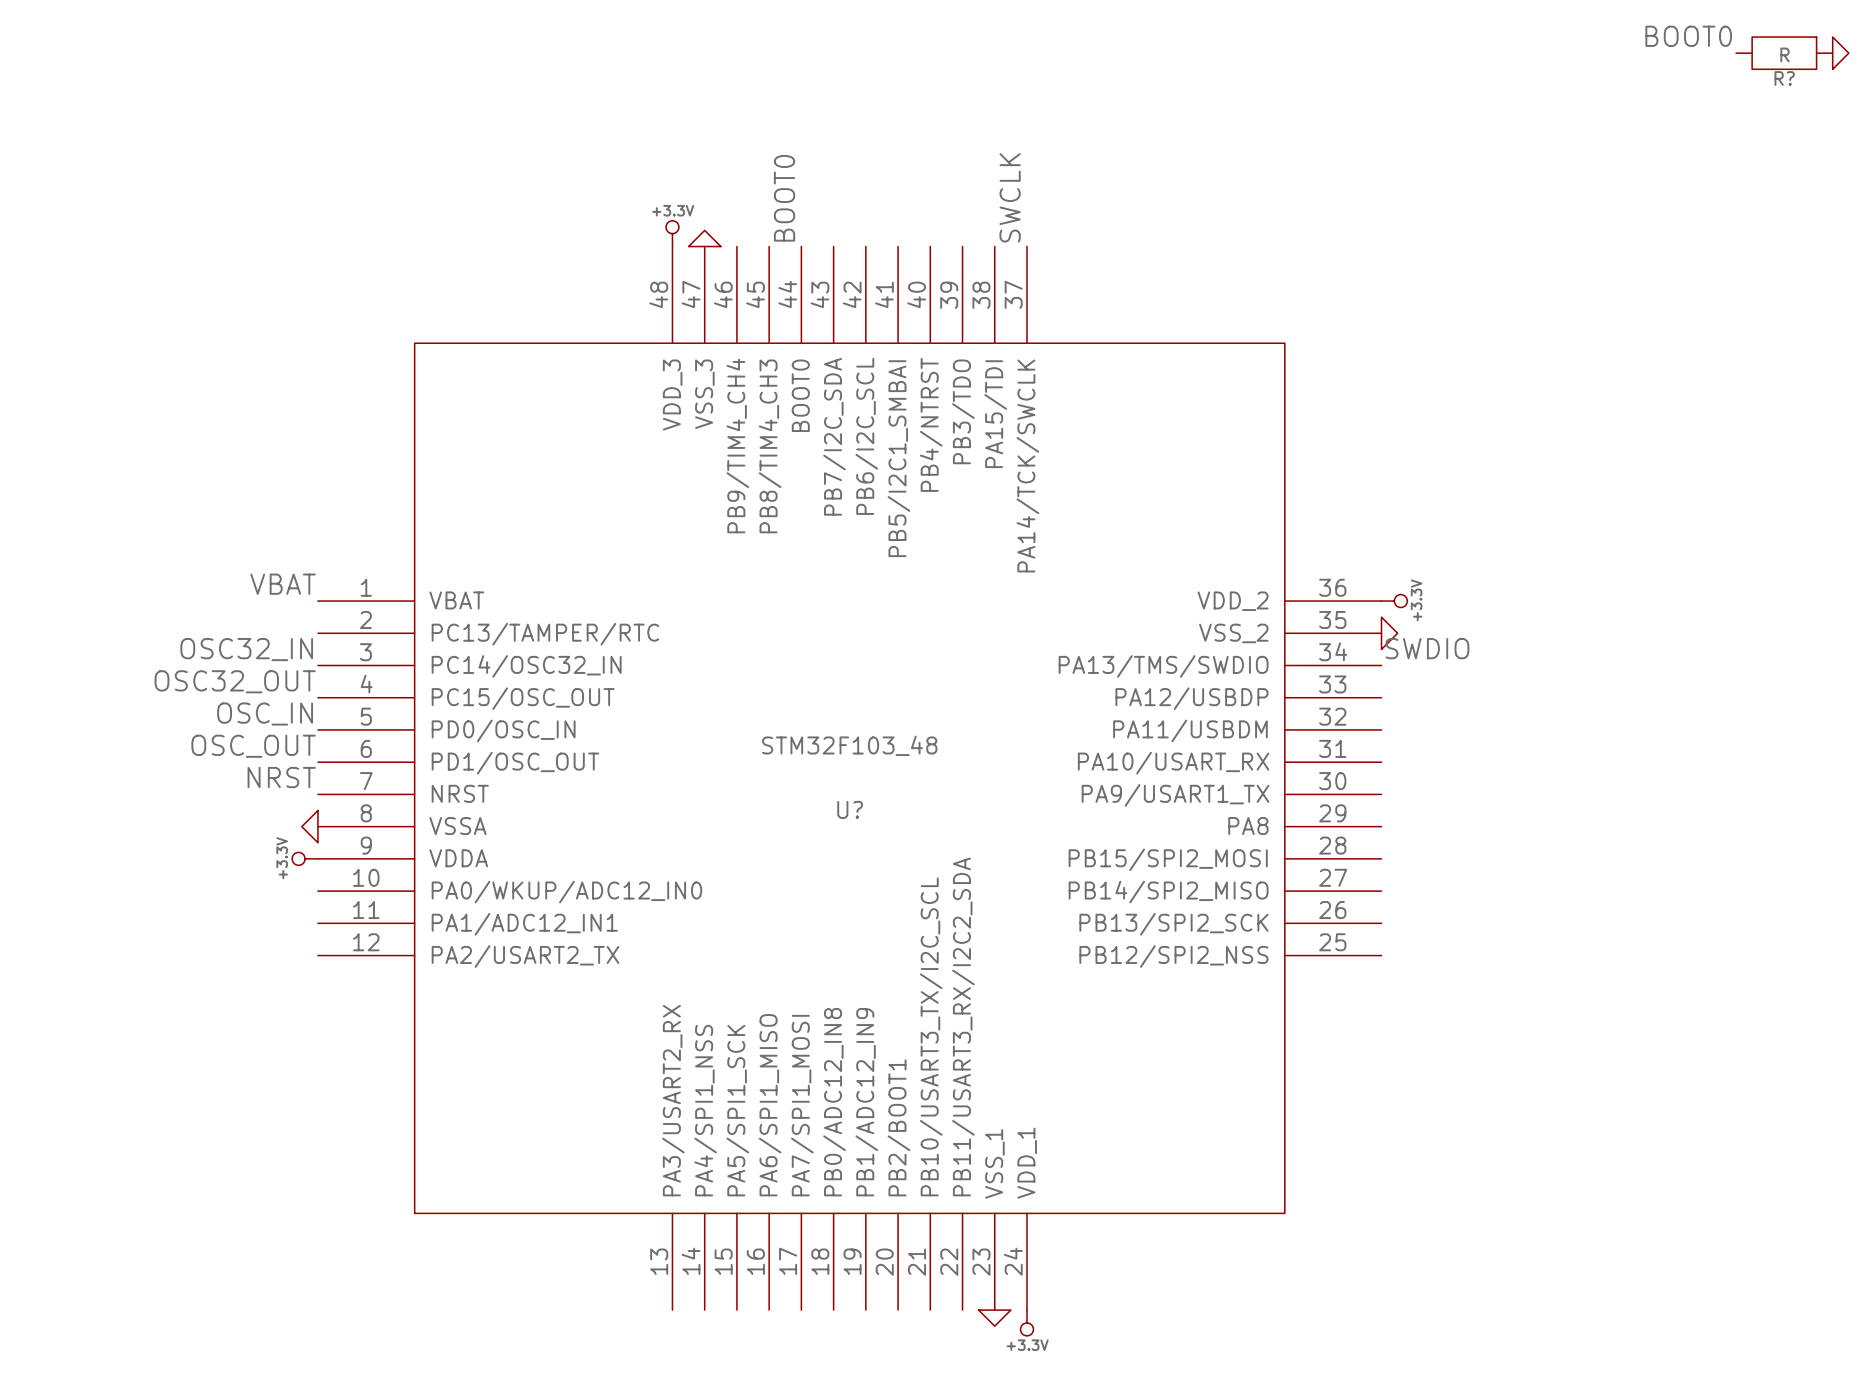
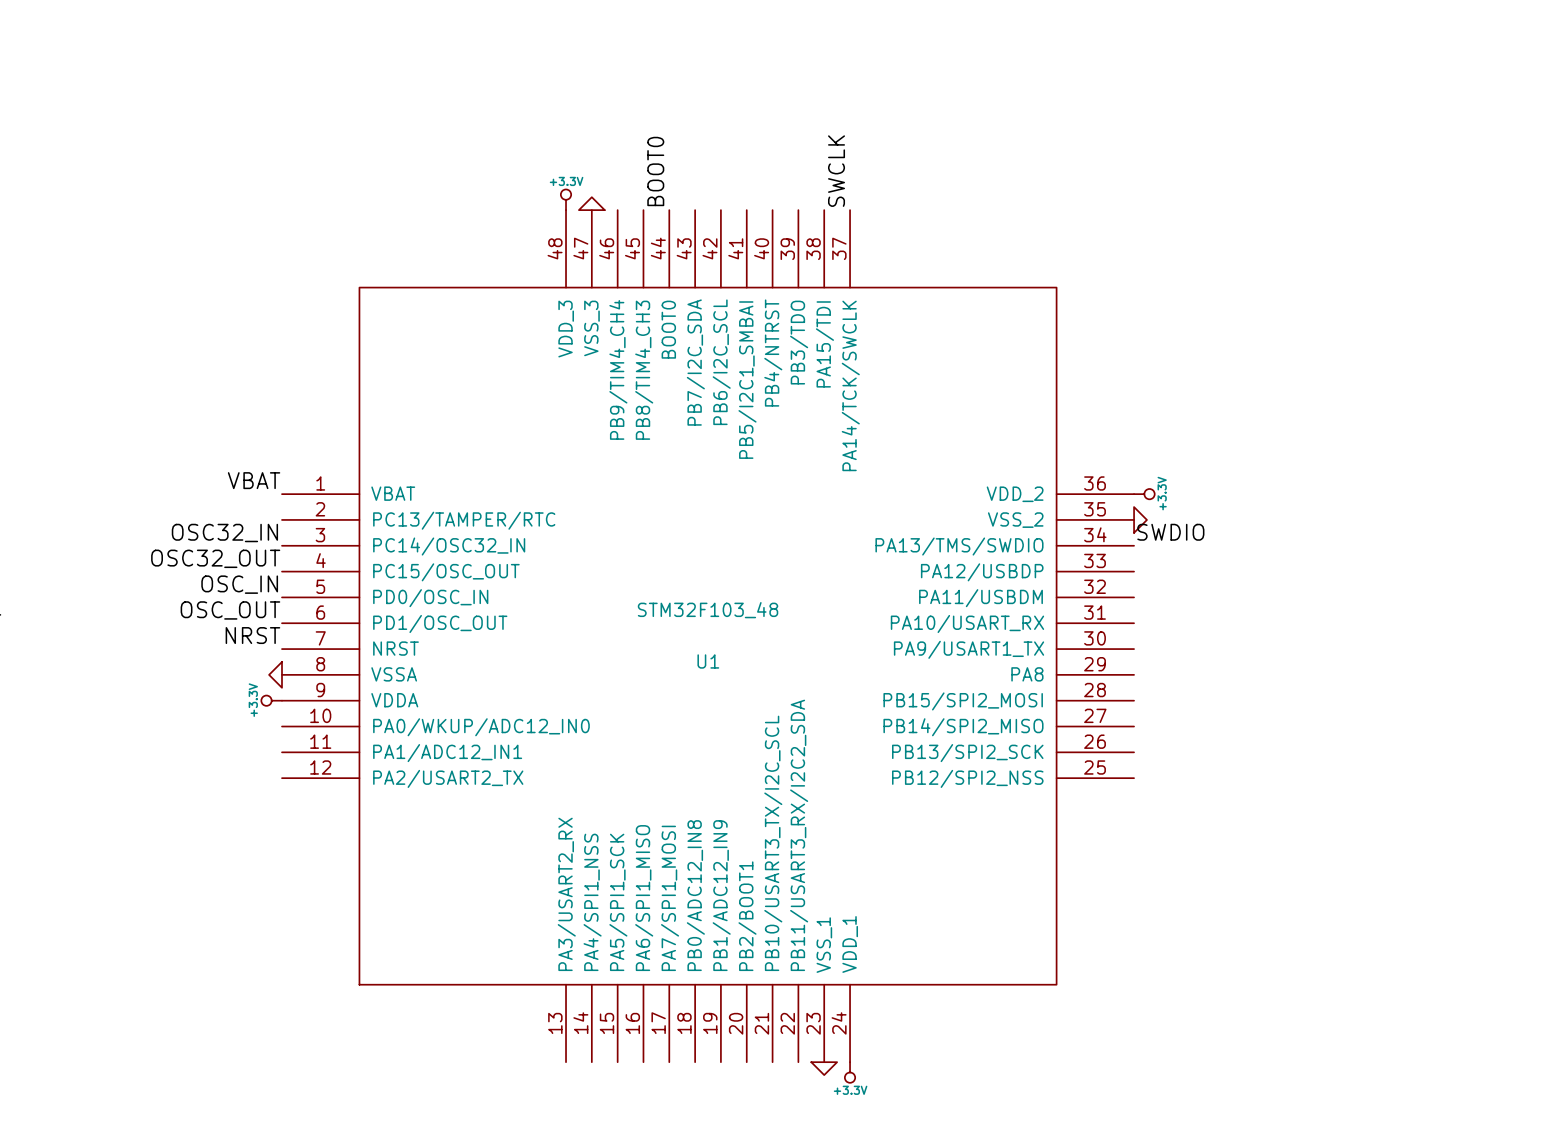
label: BOOT0 (1688, 36) -> none
R?: R (1784, 53) -> none
power symbol: (1840, 53) -> none
U? name: U? (850, 809) -> U1 (708, 661)

